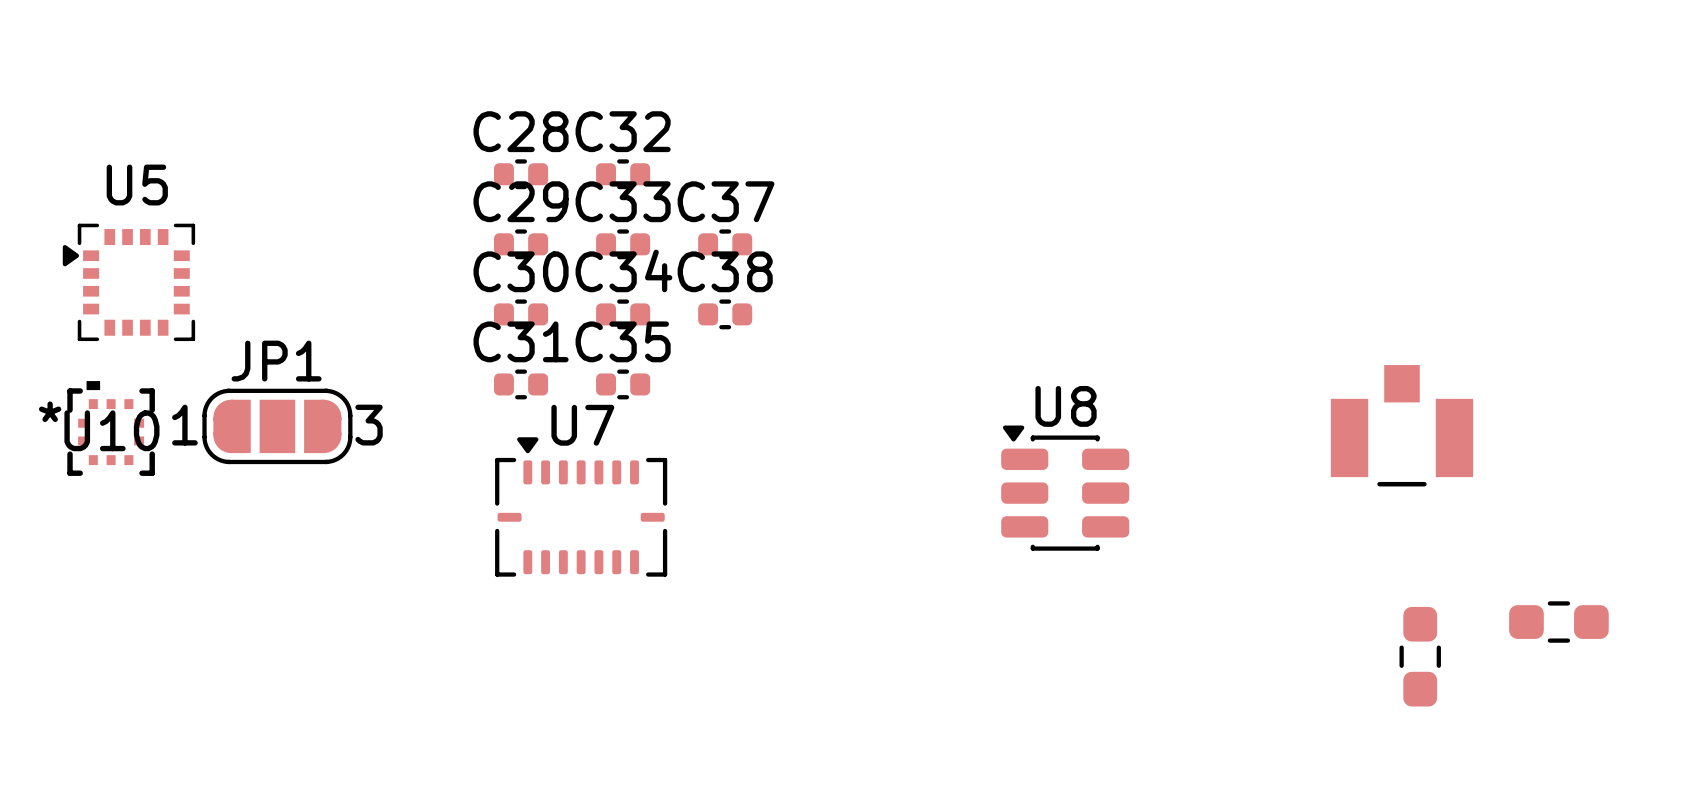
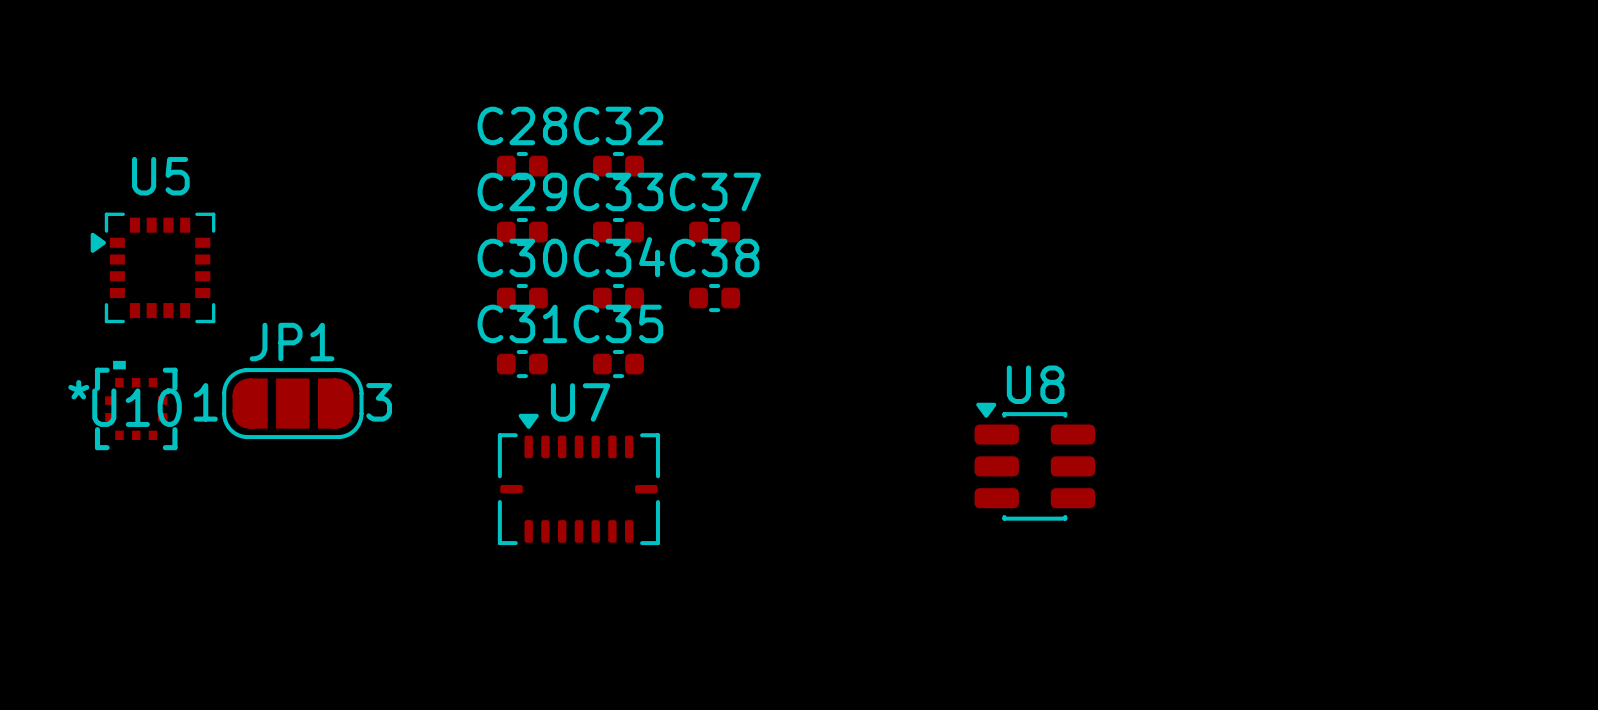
part: (1401, 425) -> none
part: (1558, 622) -> none
part: (1420, 656) -> none

